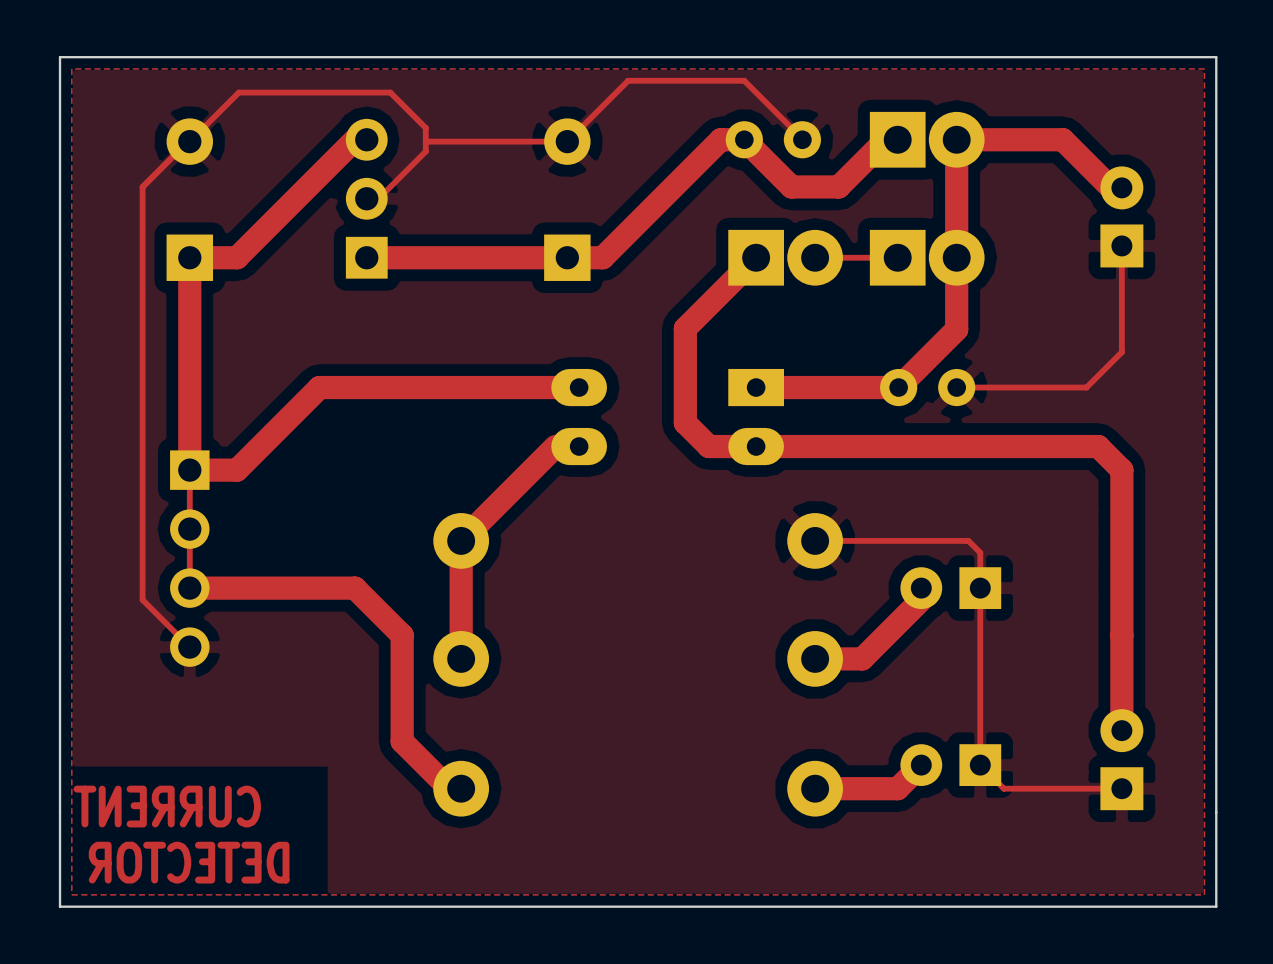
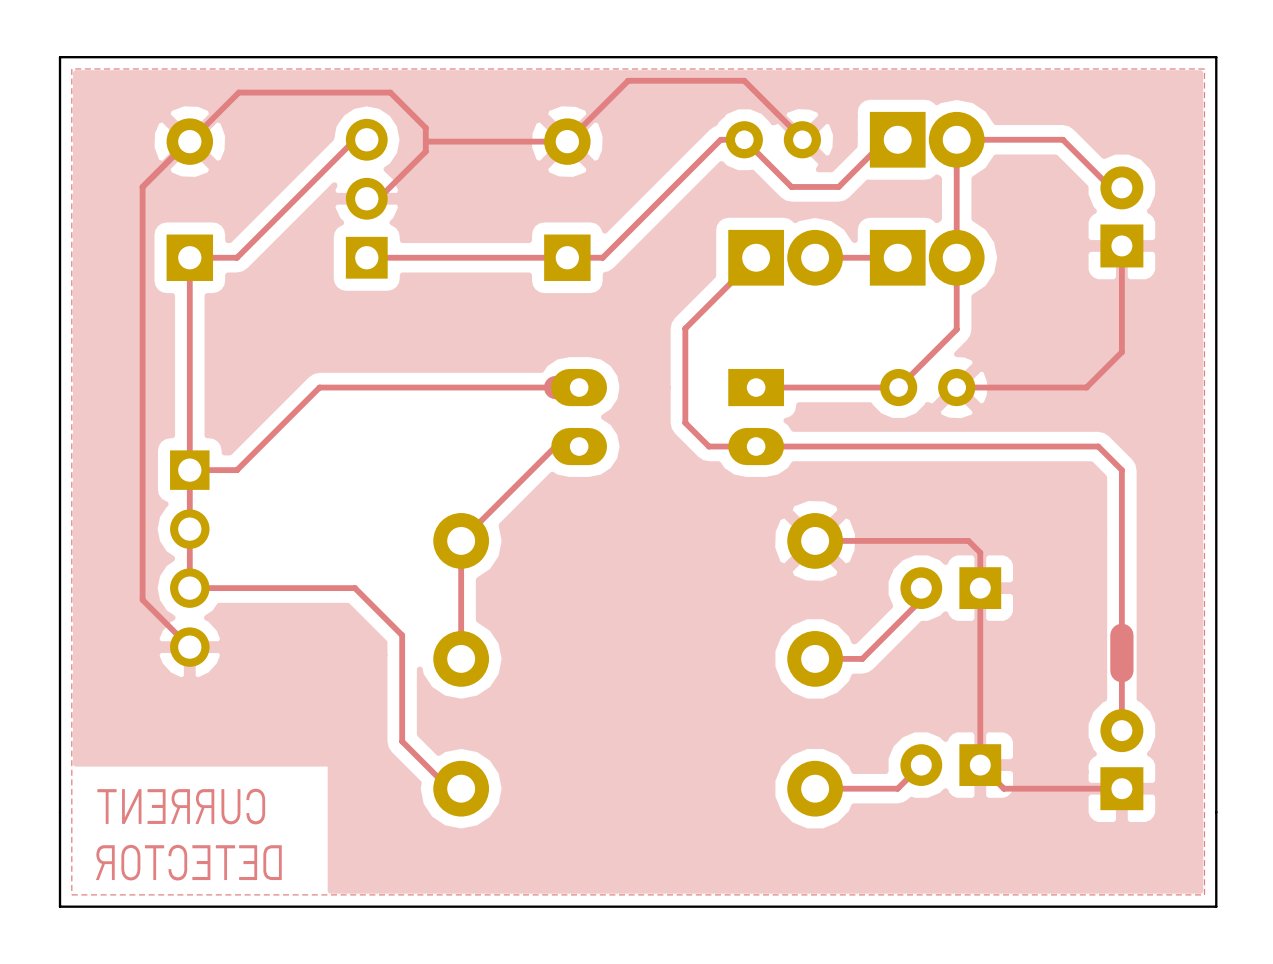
top track width: thick (354, 139) (236, 257) (189, 257) (189, 470) (236, 470) (319, 387) (555, 387) -> thin (354, 139) (236, 257) (189, 257) (189, 470) (236, 470) (319, 387) (555, 387)
top track width: thick (885, 139) (838, 186) (791, 186) (744, 139) (720, 139) (602, 257) (366, 257) -> thin (885, 139) (838, 186) (791, 186) (744, 139) (720, 139) (602, 257) (366, 257)
top track width: thick (1111, 187) (1062, 139) (956, 139) (956, 329) (898, 387) (756, 387) -> thin (1111, 187) (1062, 139) (956, 139) (956, 329) (898, 387) (756, 387)
top track width: thick (756, 257) (685, 328) (685, 422) (708, 446) (1098, 446) (1121, 470) (1121, 635) -> thin (756, 257) (685, 328) (685, 422) (708, 446) (1098, 446) (1121, 470) (1121, 635)
top track width: thick (555, 446) (461, 540) (461, 658) -> thin (555, 446) (461, 540) (461, 658)
top track width: thick (189, 588) (354, 588) (402, 635) (402, 741) (449, 788) -> thin (189, 588) (354, 588) (402, 635) (402, 741) (449, 788)
top track width: thick (921, 599) (862, 658) (815, 658) -> thin (921, 599) (862, 658) (815, 658)
top track width: thick (1121, 670) (1121, 730) -> thin (1121, 670) (1121, 730)
top track width: thick (921, 765) (897, 788) (815, 788) -> thin (921, 765) (897, 788) (815, 788)

